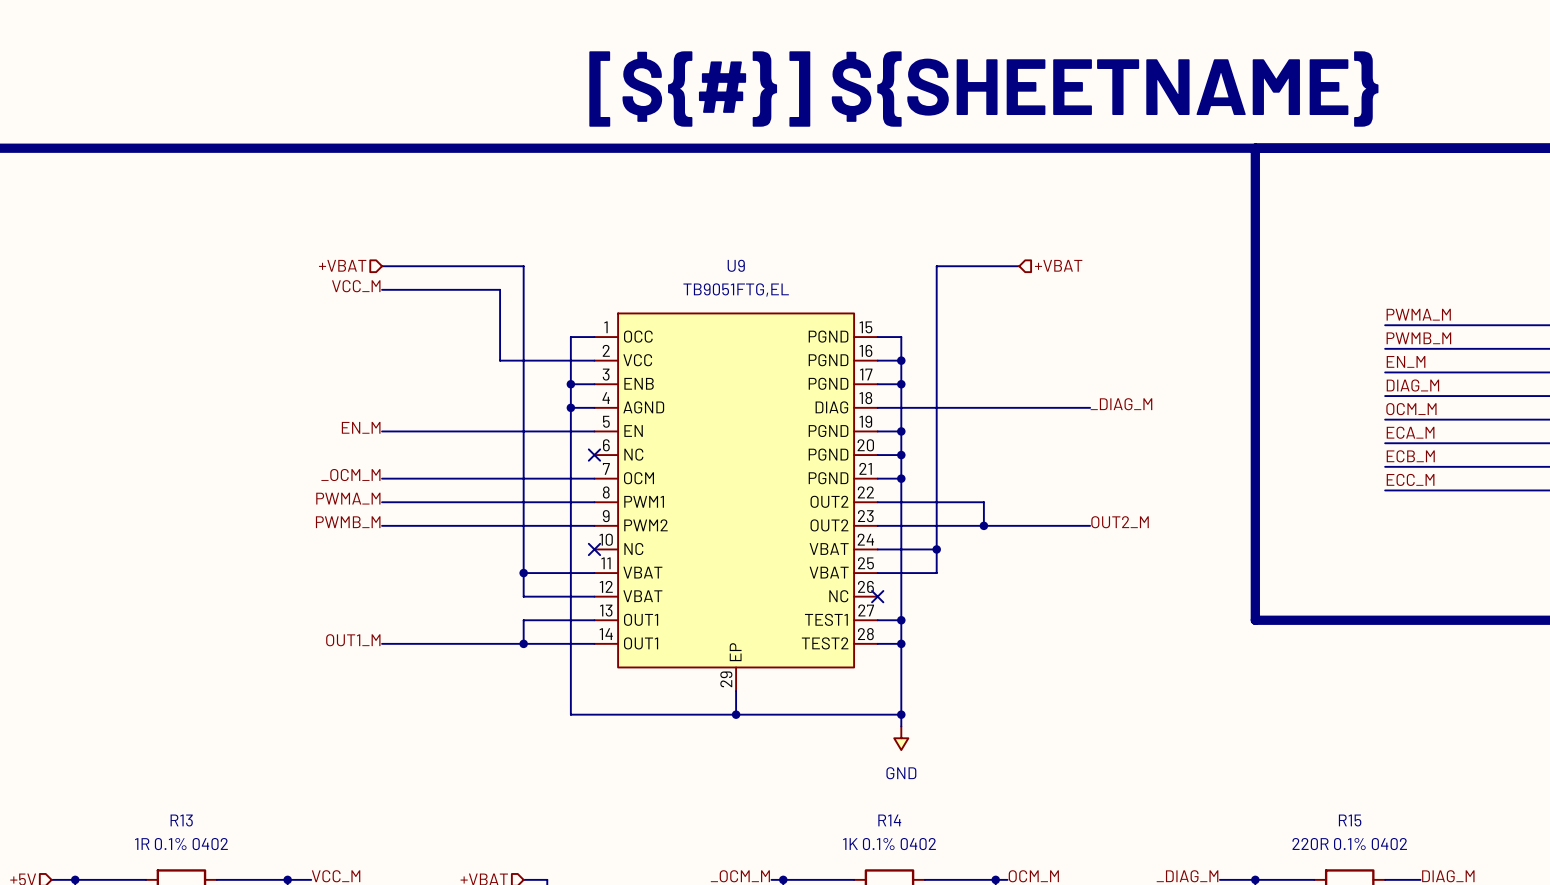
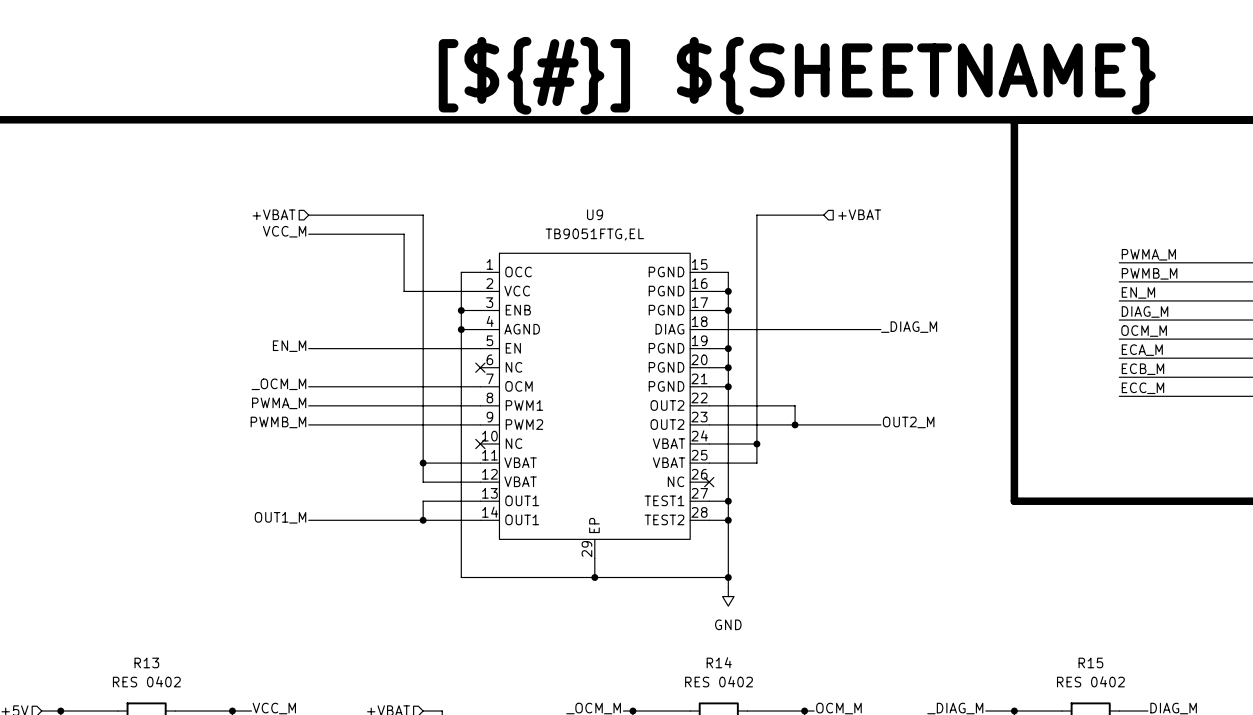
R13 value: 1R 0.1% 0402 (181, 844) -> RES 0402 (146, 681)
R14 value: 1K 0.1% 0402 (889, 844) -> RES 0402 (719, 681)
R15 value: 220R 0.1% 0402 (1349, 844) -> RES 0402 (1090, 681)

